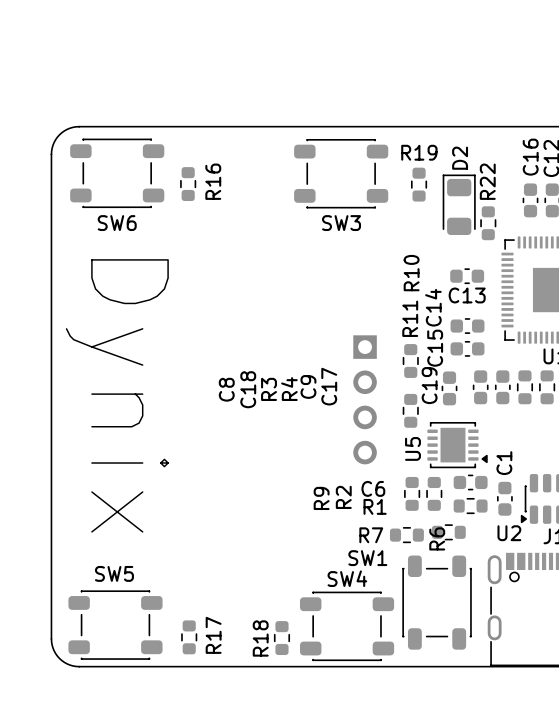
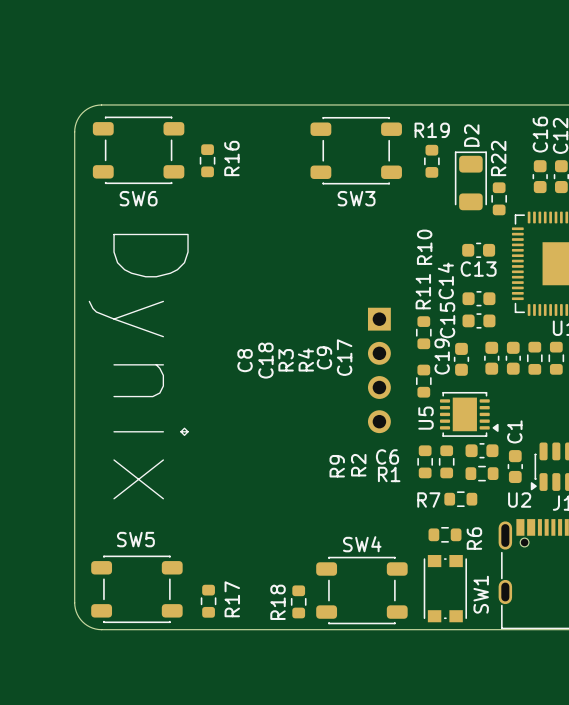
R7 name position: R7 (371, 535) -> R7 (428, 500)
R6 position: (406, 535) -> (445, 534)
SW1 footprint: [402, 555, 472, 650] -> [423, 555, 468, 623]
SW1 name position: SW1 (367, 558) -> SW1 (481, 594)

